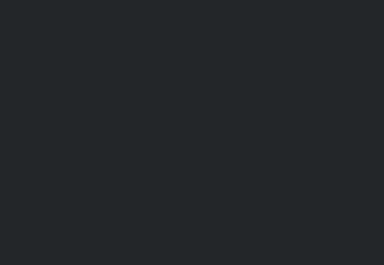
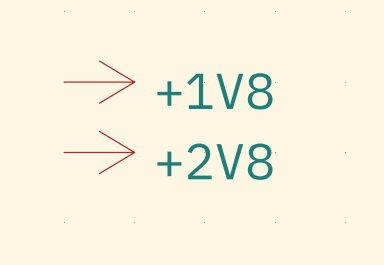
power symbol: none -> +1V8 (99, 82)
power symbol: none -> +2V8 (99, 152)

